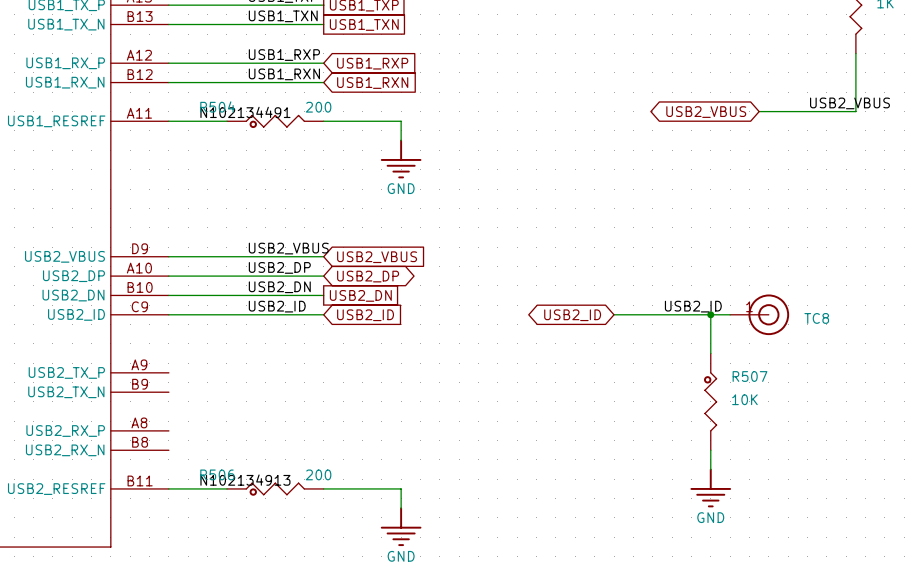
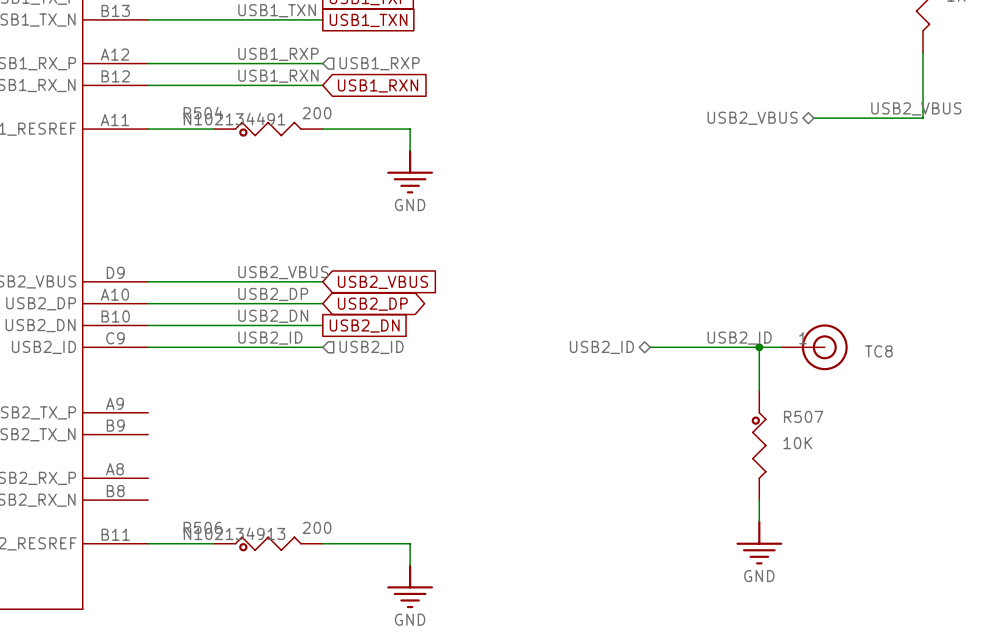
global label: USB1_RXP (372, 63) -> none
hierarchical label: none -> USB1_RXP (379, 63)
hierarchical label: none -> USB2_VBUS (752, 118)
global label: USB2_VBUS (706, 112) -> none
hierarchical label: none -> USB2_ID (371, 347)
hierarchical label: none -> USB2_ID (601, 347)
global label: USB2_ID (365, 315) -> none
global label: USB2_ID (572, 315) -> none

